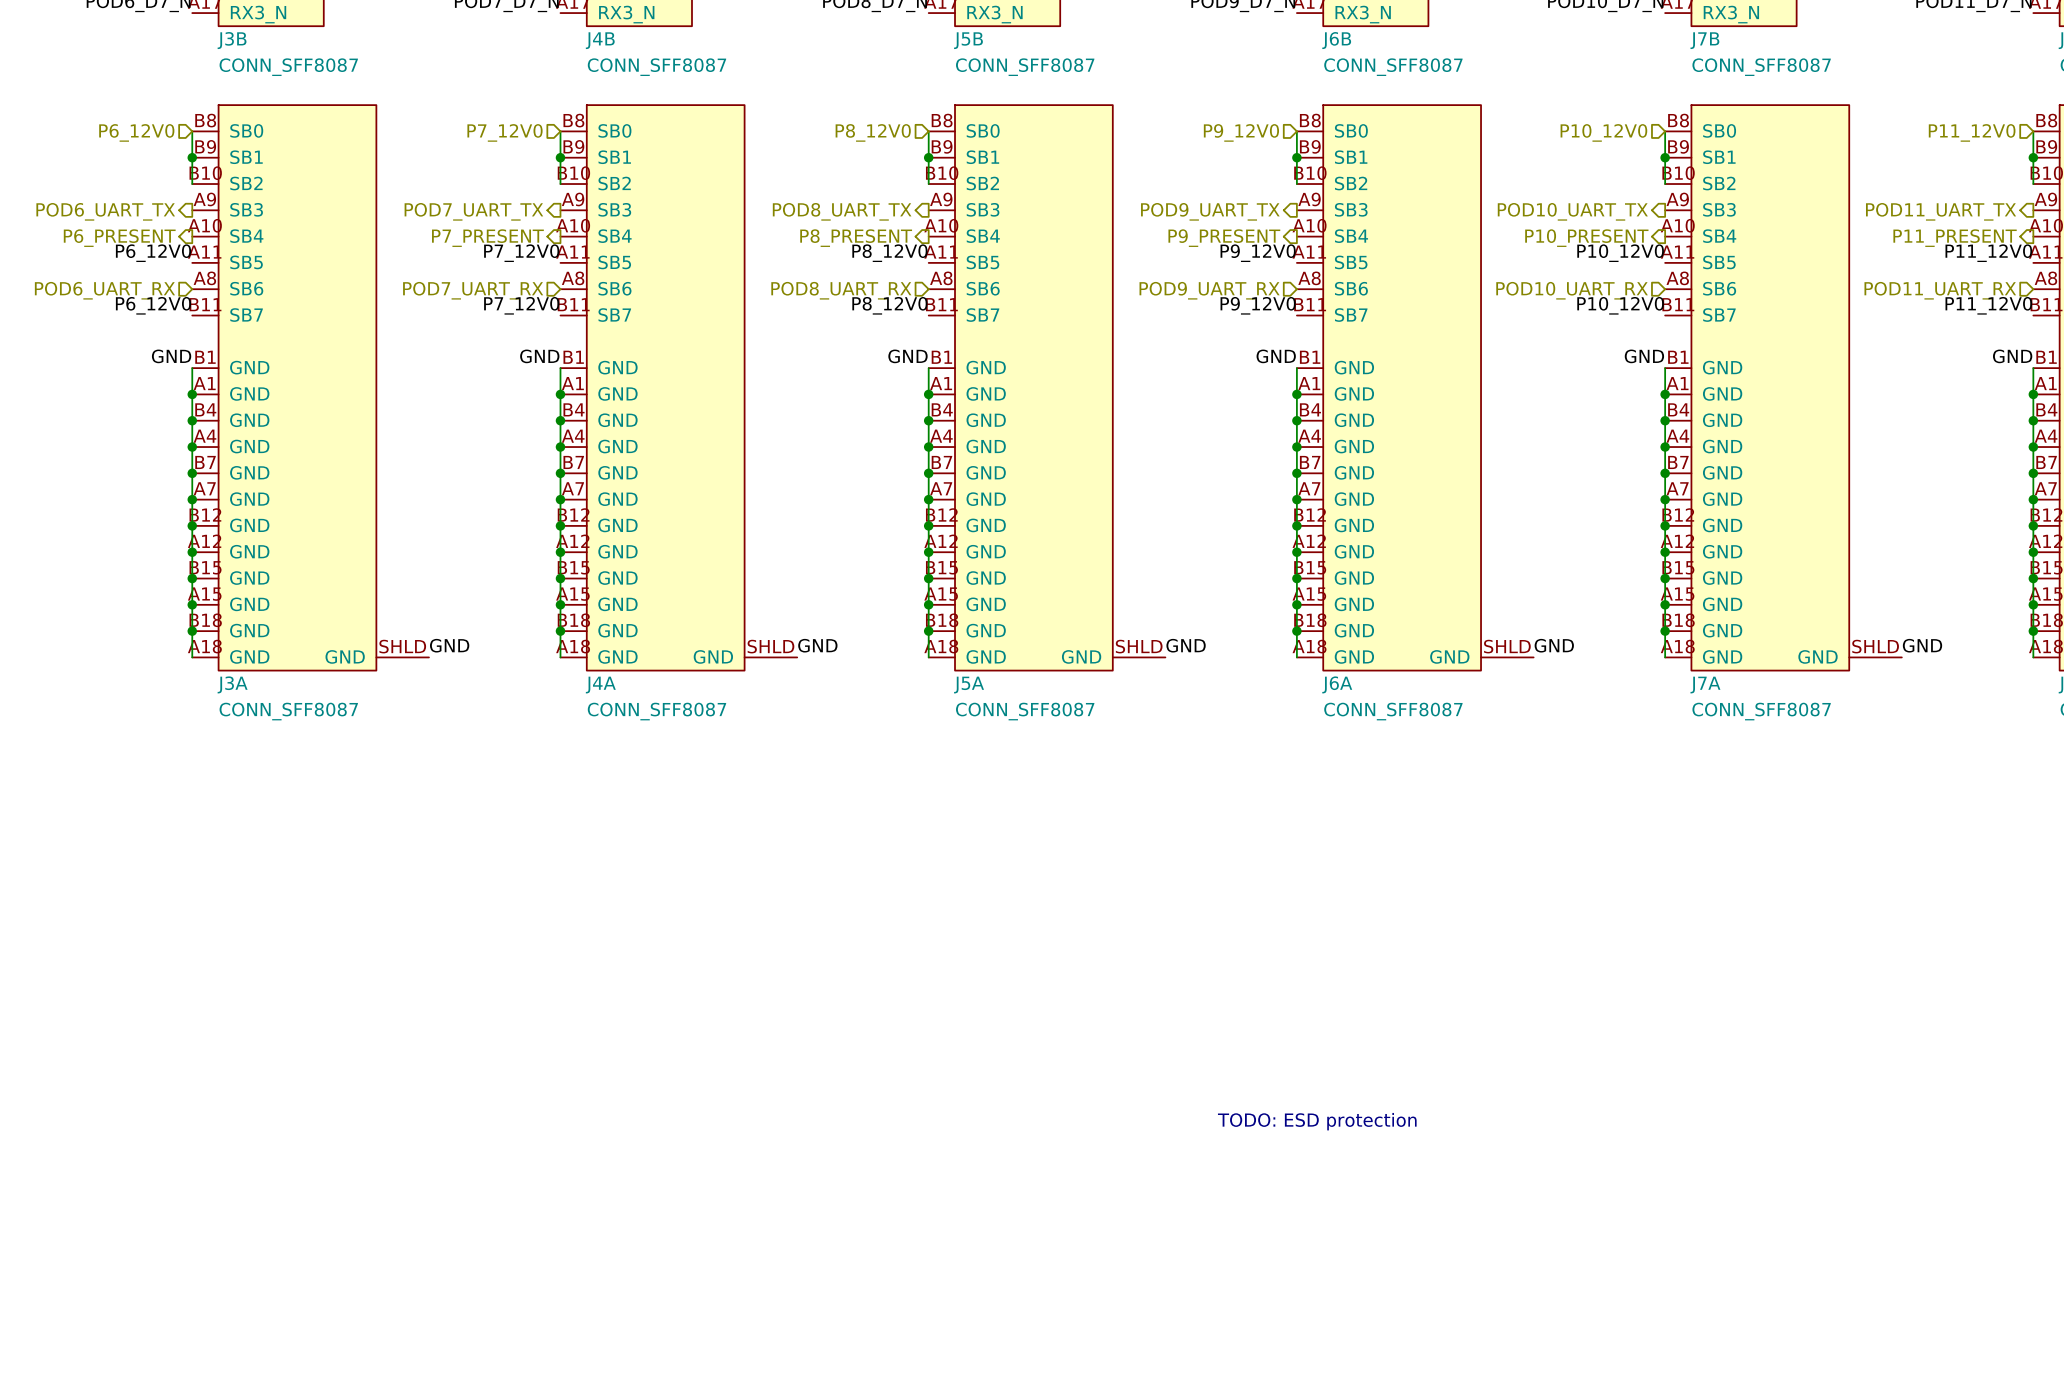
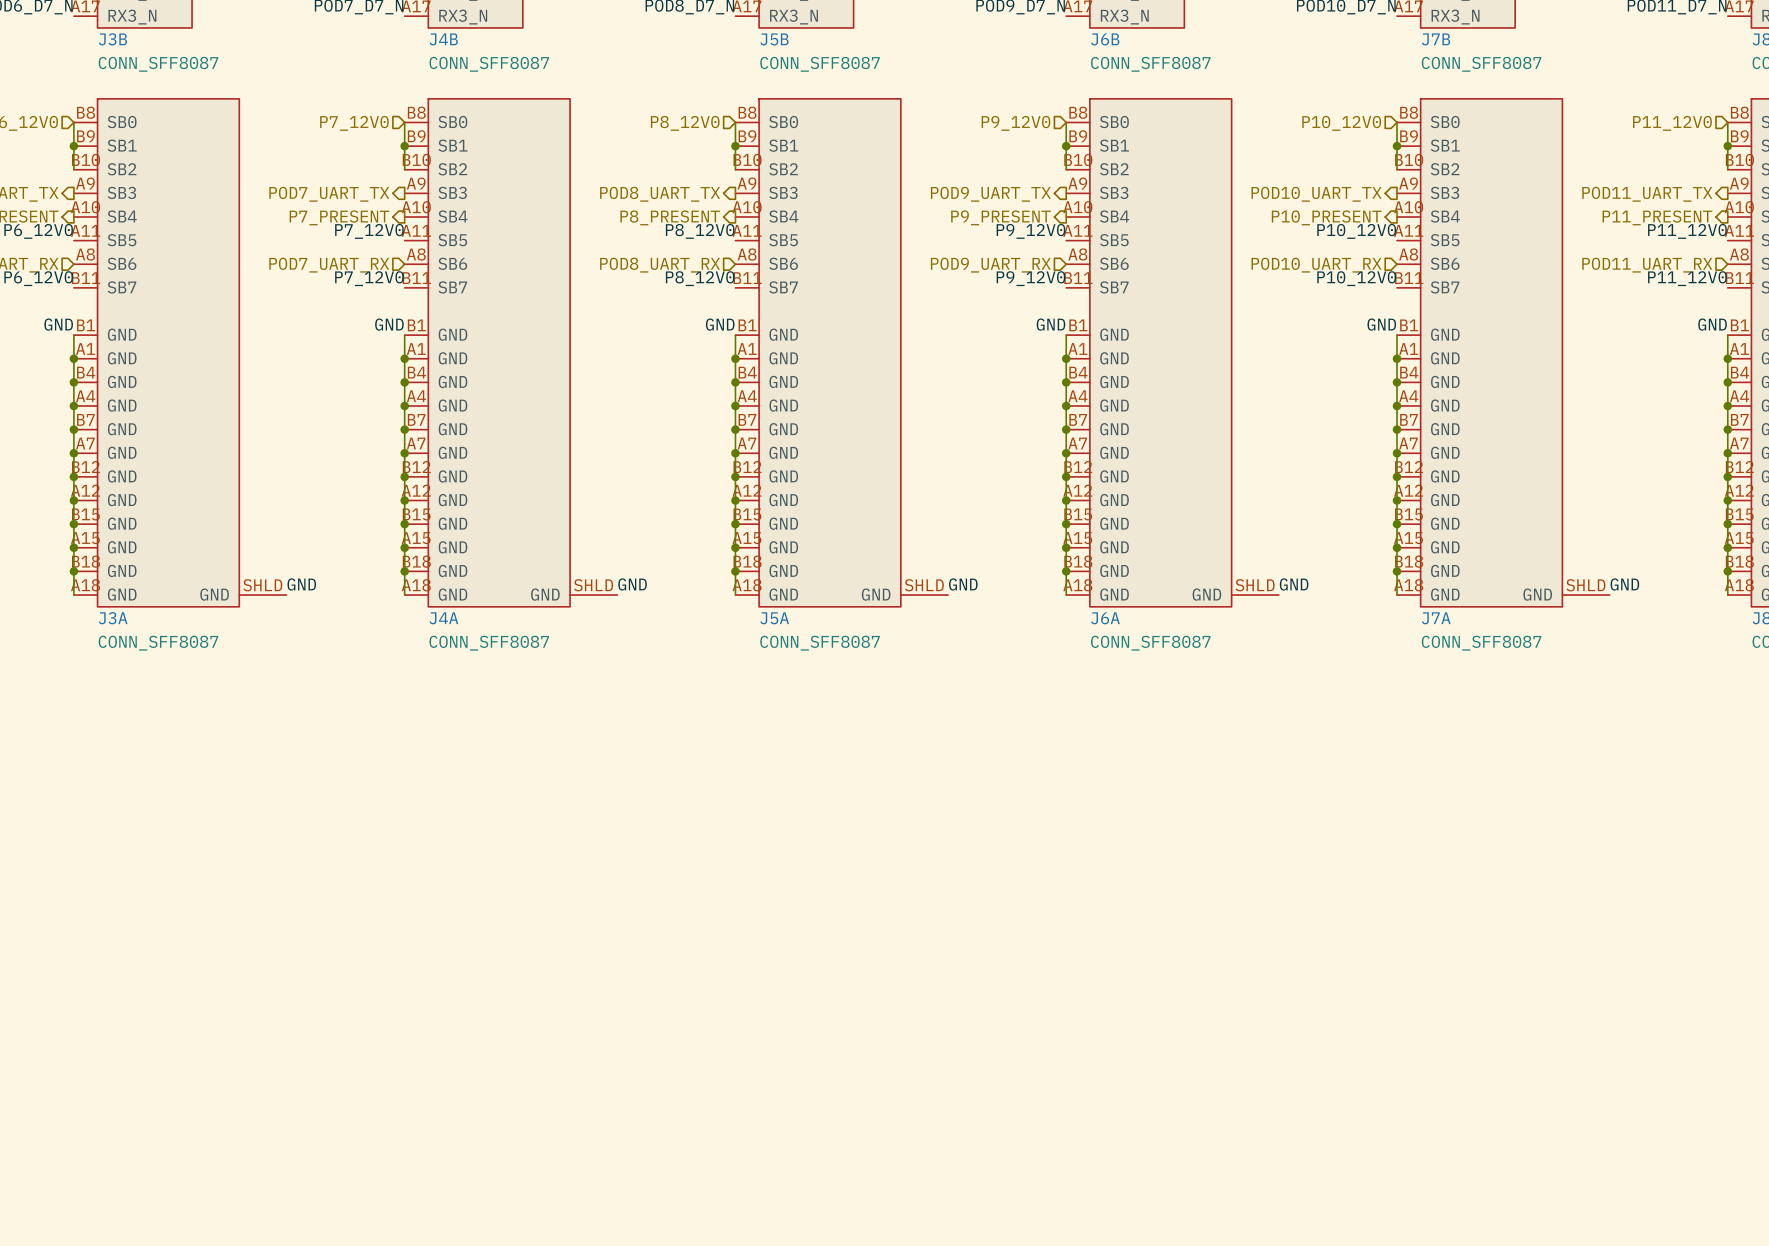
text: TODO: ESD protection (1317, 1121) -> none

